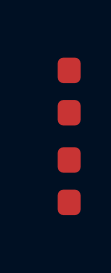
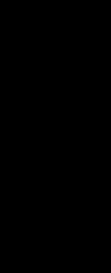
part: (69, 91) -> none
part: (69, 181) -> none

